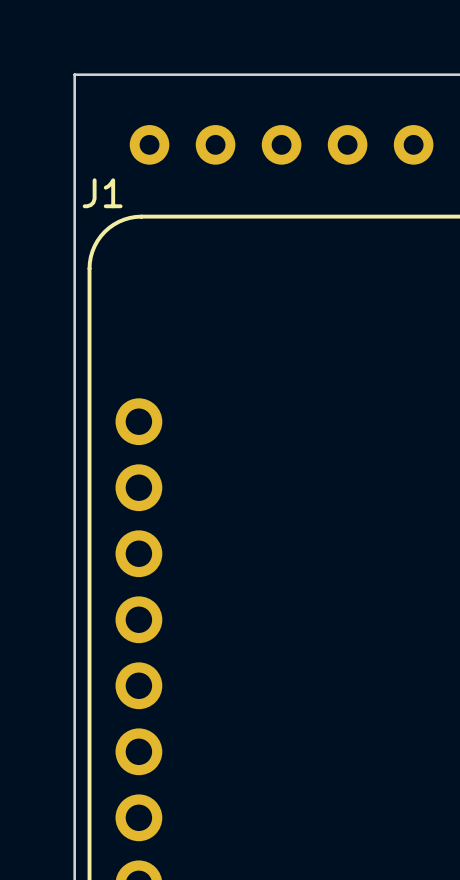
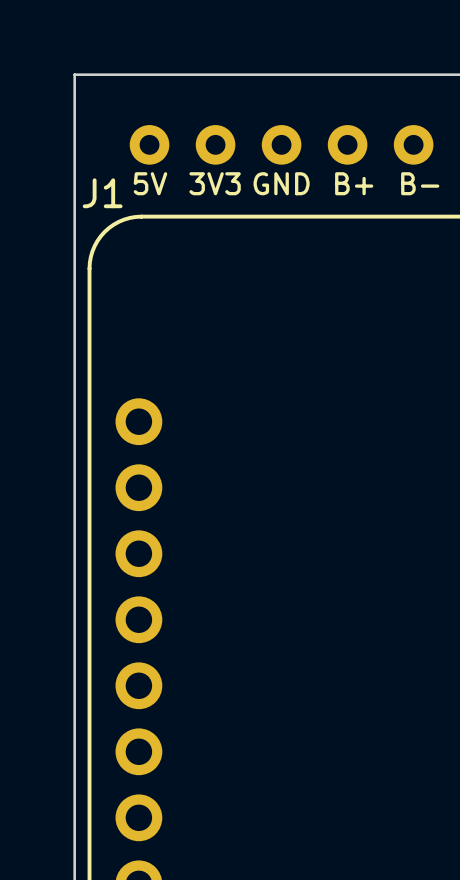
J1 text: none -> 5V (150, 183)
J1 text: none -> 3V3 (215, 183)
J1 text: none -> GND (281, 183)
J1 text: none -> B+ (354, 183)
J1 text: none -> B- (420, 183)

